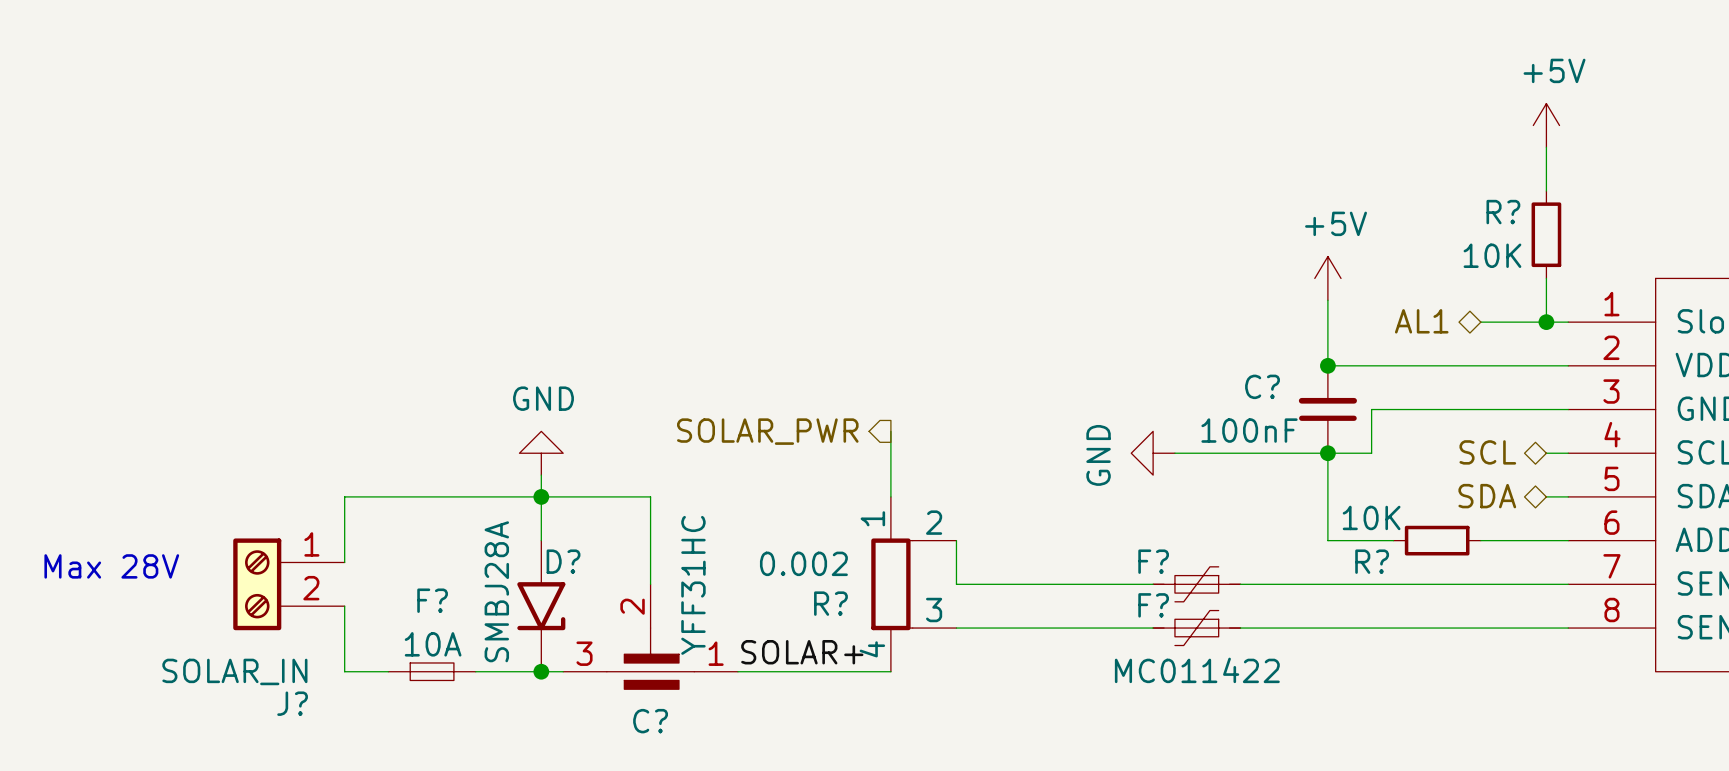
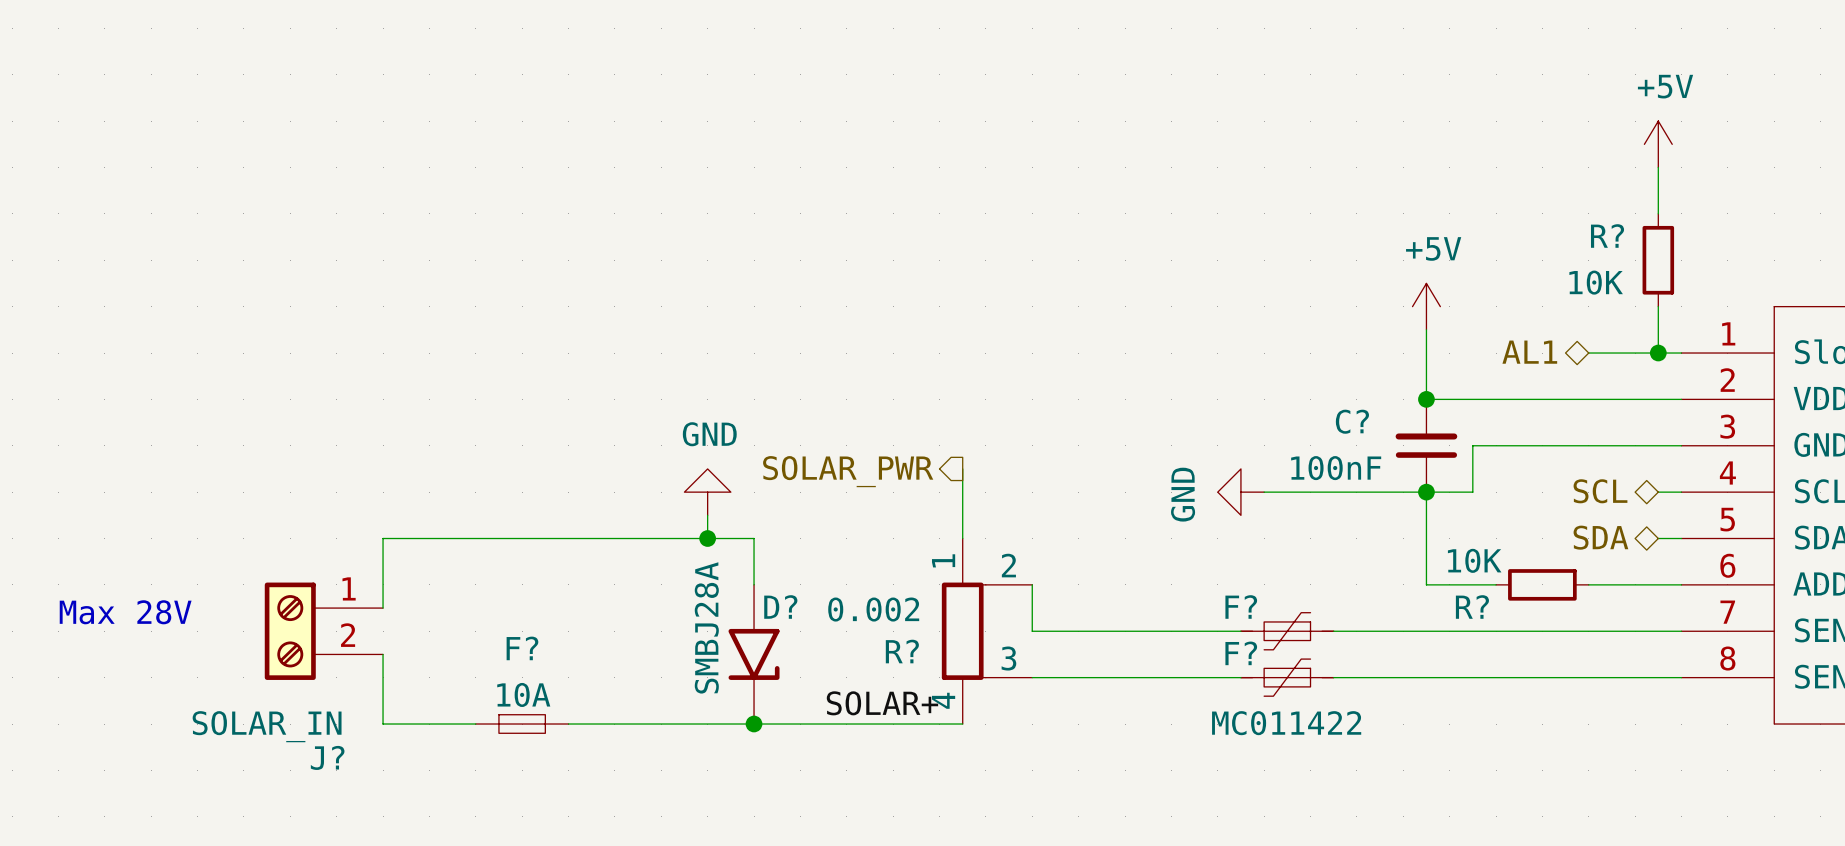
power symbol position: GND (541, 453) -> GND (707, 492)
wire: (541, 475) (541, 540) -> none
wire: none -> (707, 515) (707, 538) (754, 538) (754, 584)
junction: (541, 496) -> none
wire: (650, 496) (650, 584) -> none
junction: none -> (707, 538)
D? position: (541, 606) -> (754, 654)
C?: YFF31HC (650, 636) -> none
F? position: (432, 671) -> (522, 724)
junction: (541, 671) -> none
junction: none -> (754, 724)

